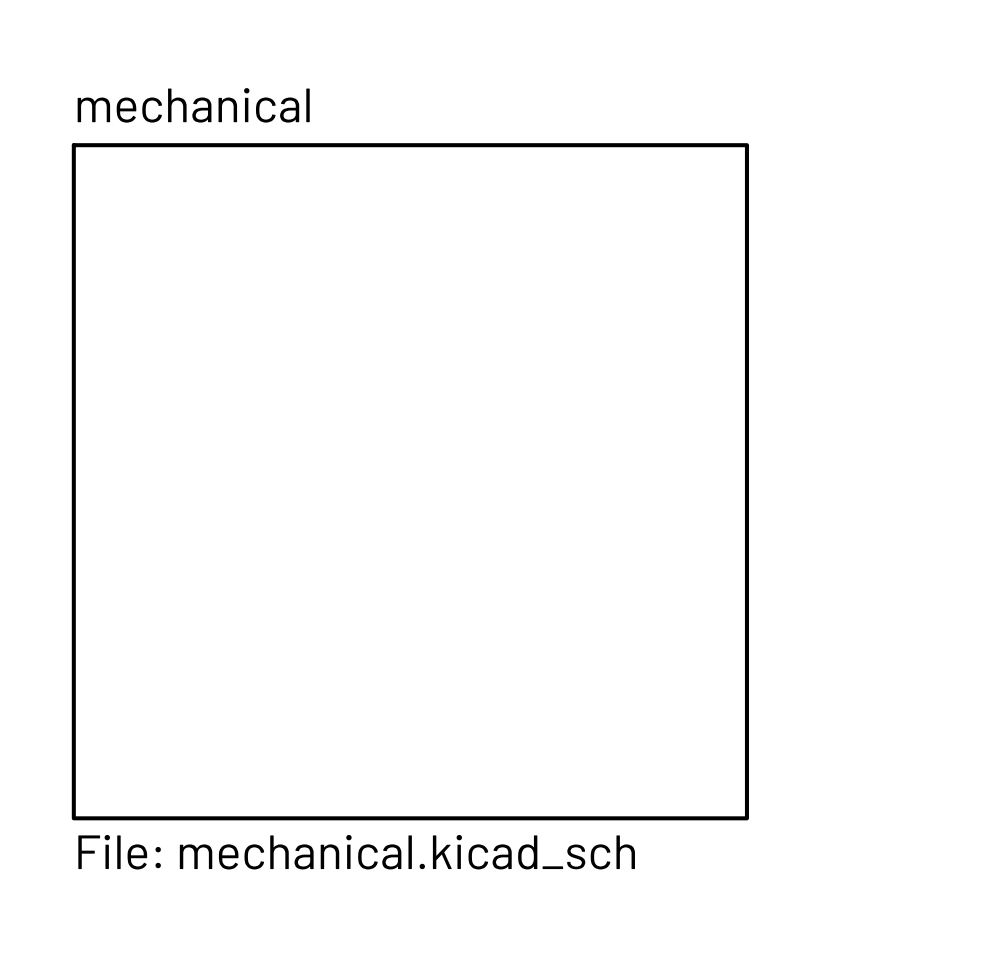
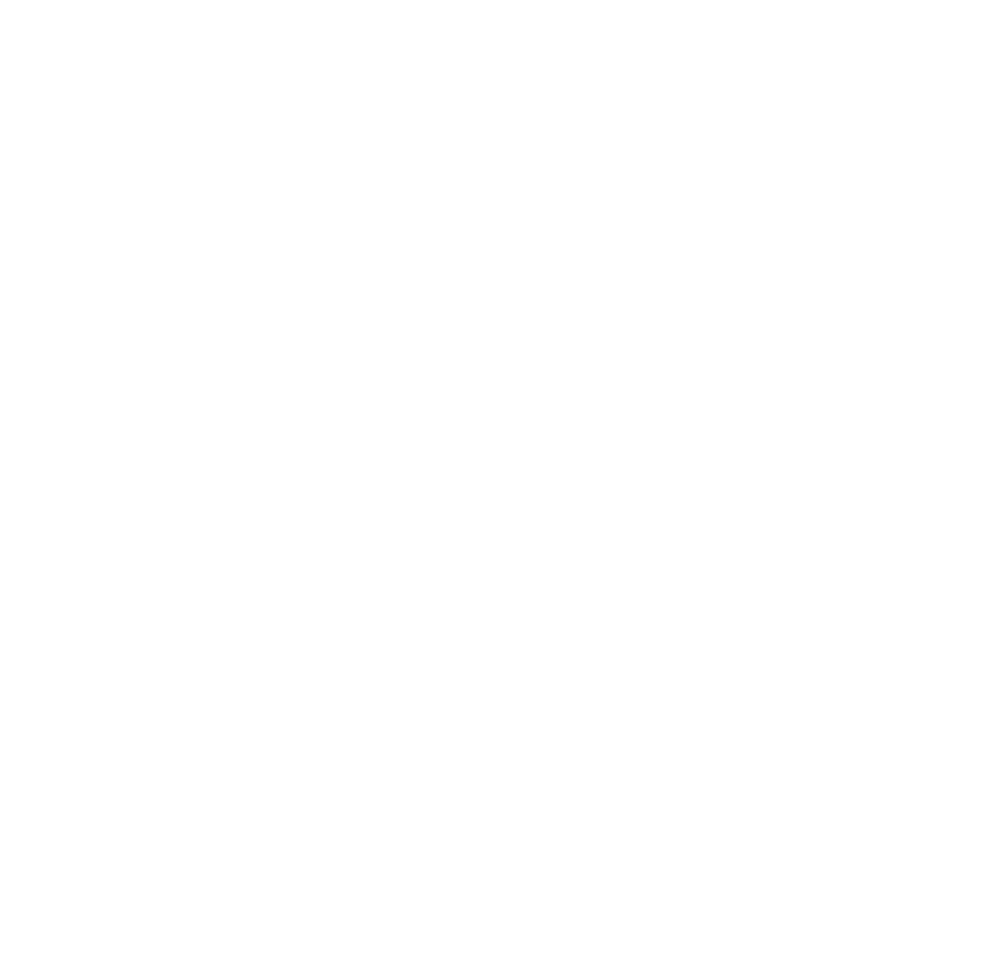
sheet mechanical: File: mechanical.kicad_sch (410, 481) -> none

